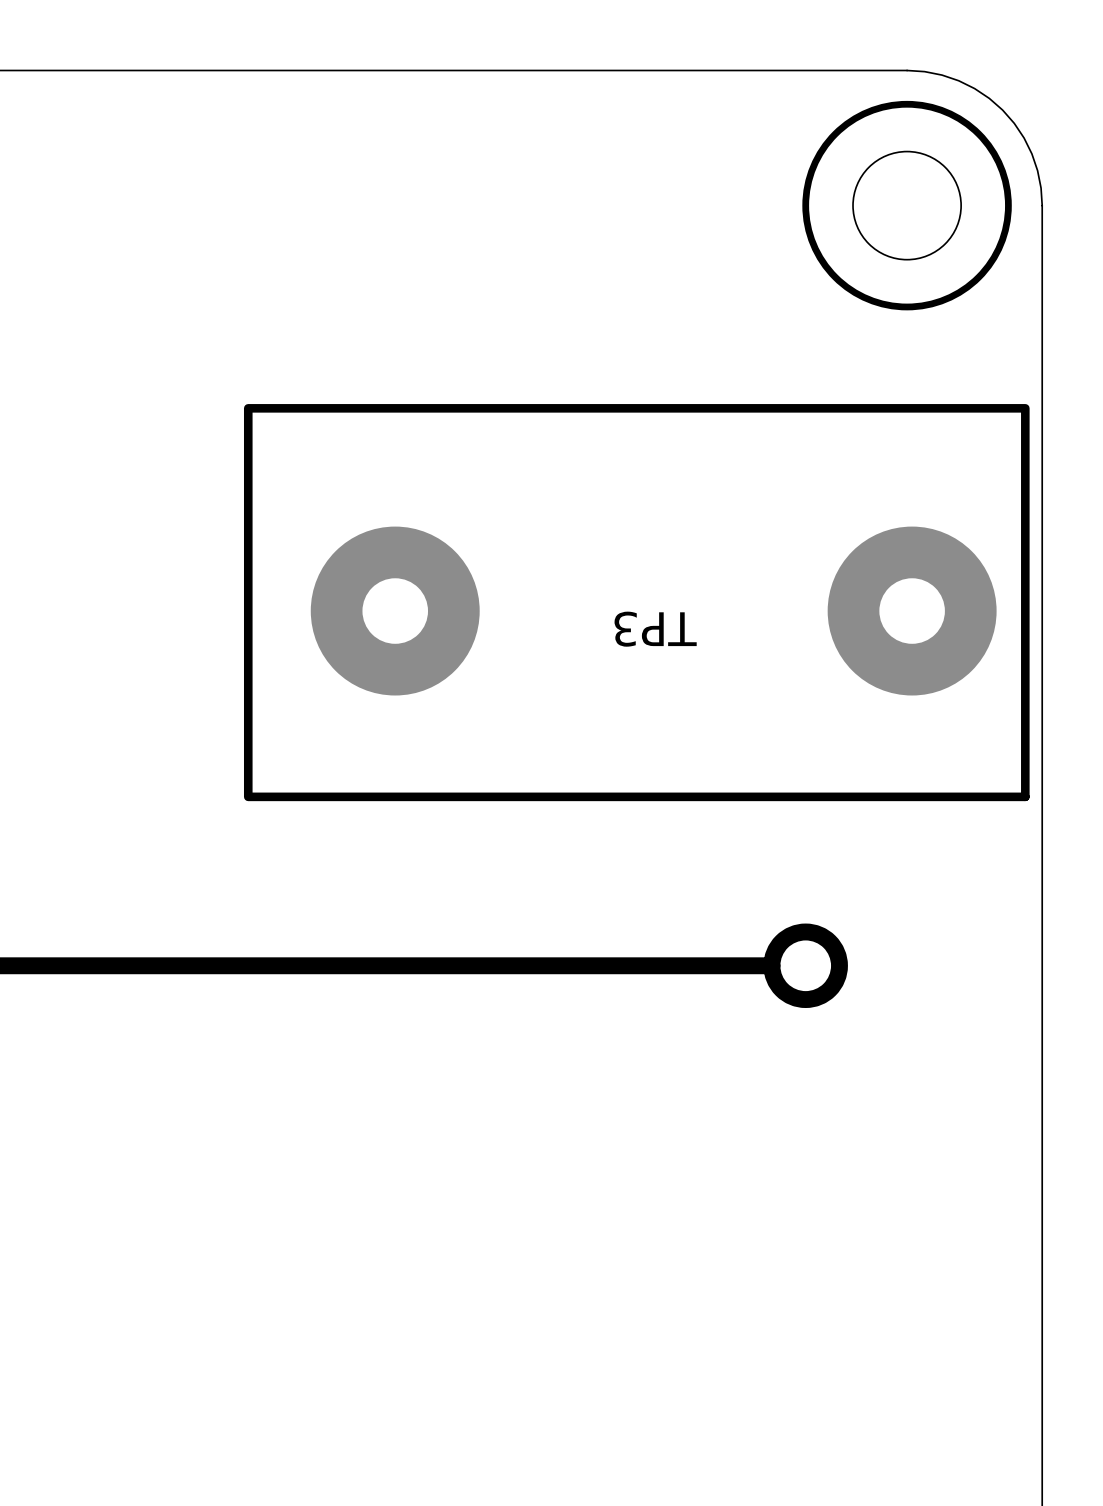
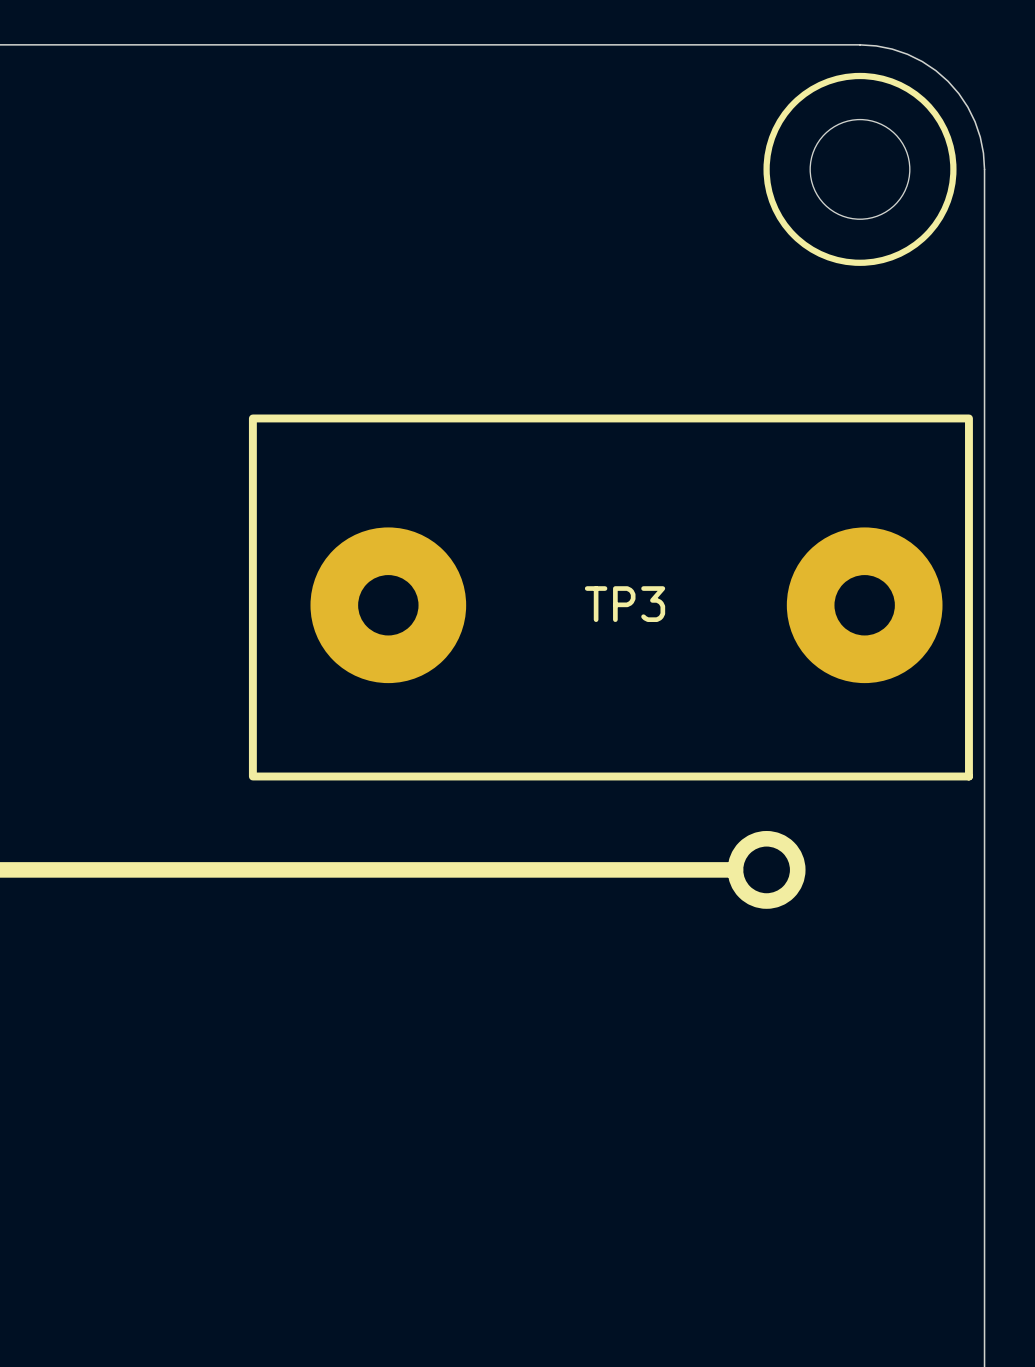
TP3 position: (636, 602) -> (610, 597)
TP3 name rotation: 0° (655, 629) -> 180° (625, 604)

